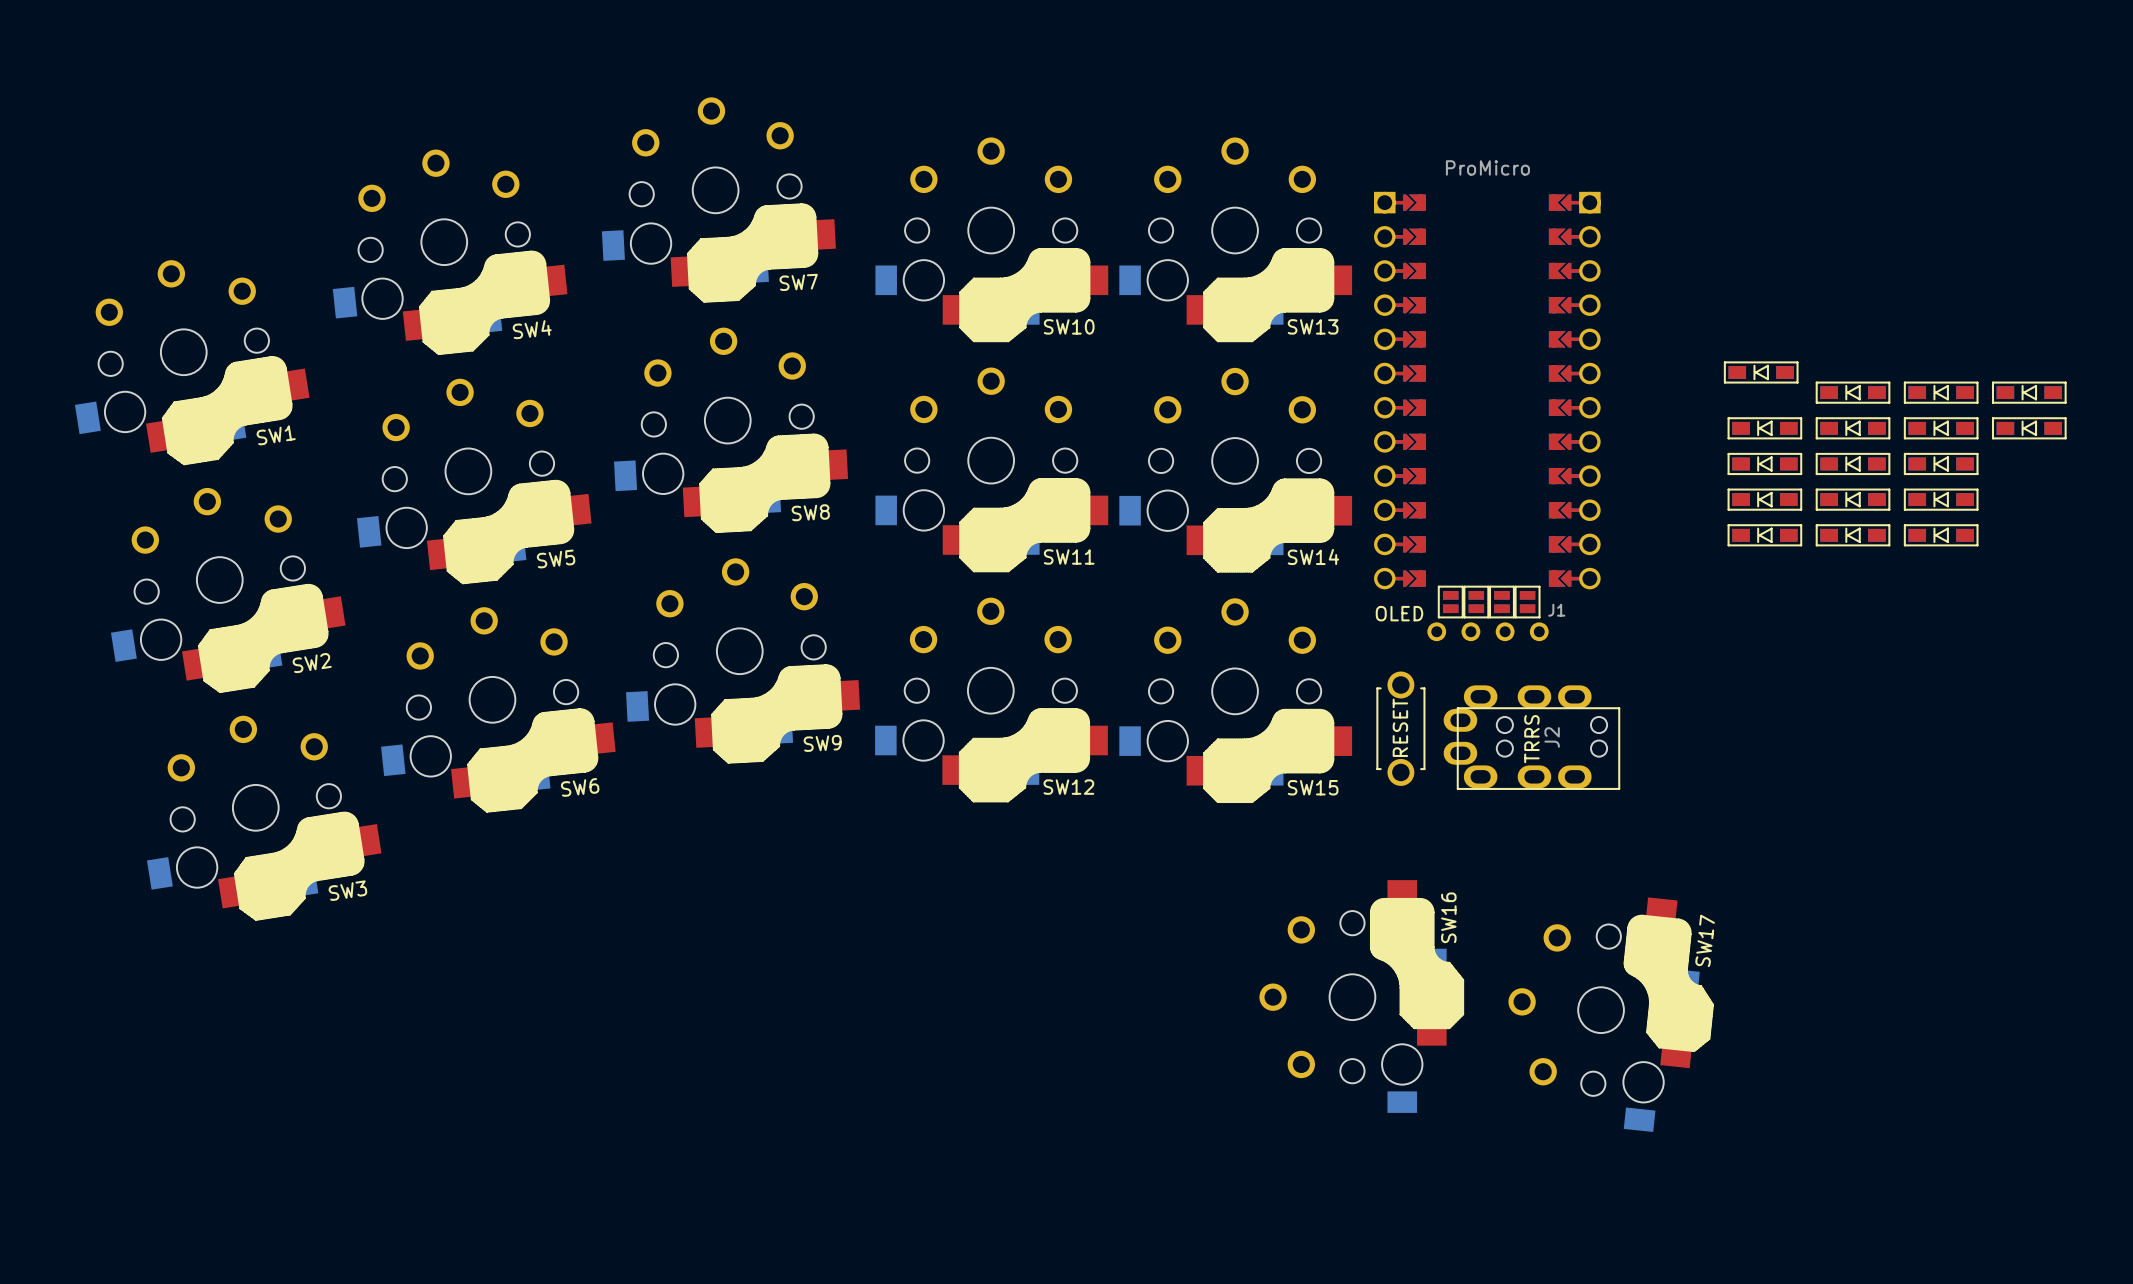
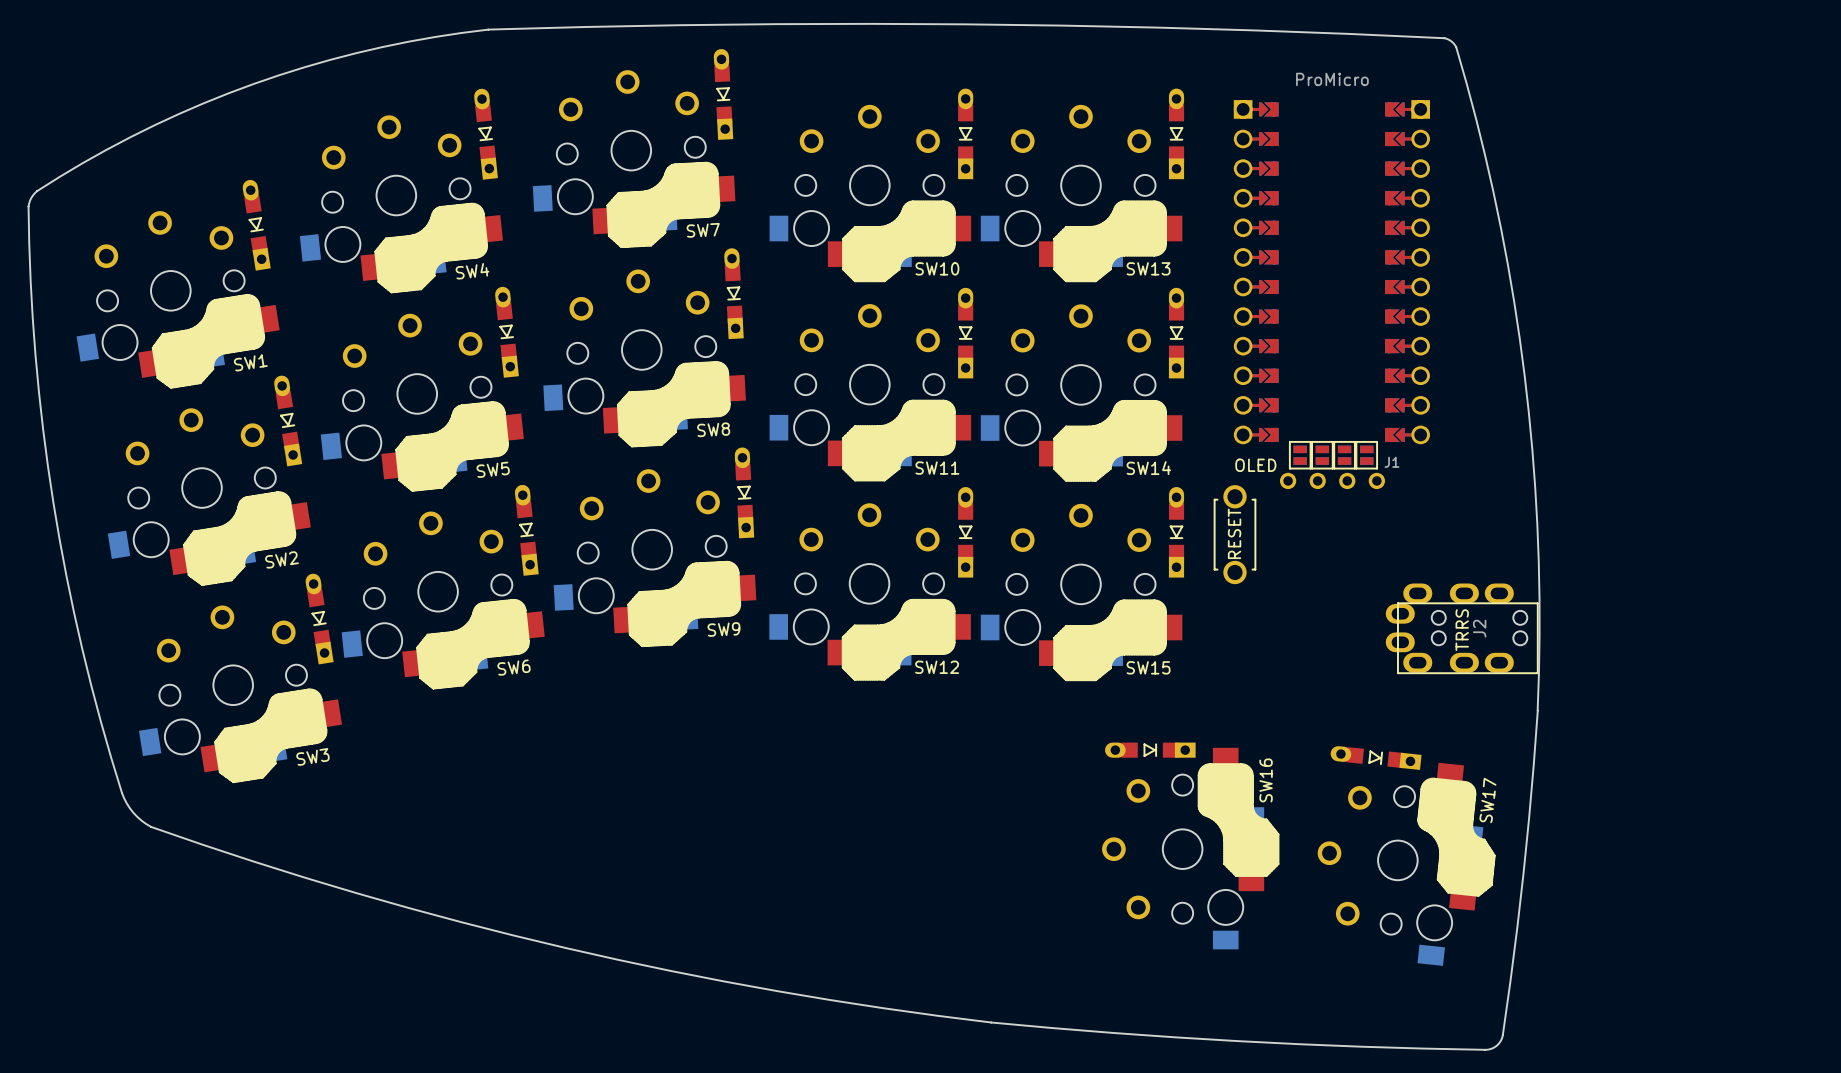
part: none -> (723, 94)
part: none -> (965, 133)
part: none -> (1176, 133)
part: none -> (486, 134)
part: none -> (256, 225)
part: none -> (734, 293)
part: (1761, 372) -> none
part position: (1487, 390) -> (1331, 272)
part: (1853, 392) -> none
part: (1941, 392) -> none
part: (2029, 392) -> none
part: none -> (507, 332)
part: none -> (965, 333)
part: none -> (1176, 333)
part: (1764, 428) -> none
part: (1853, 428) -> none
part: (1941, 428) -> none
part: (2029, 428) -> none
part: (1764, 463) -> none
part: (1853, 463) -> none
part: (1941, 463) -> none
part: (1764, 499) -> none
part: (1853, 499) -> none
part: (1941, 499) -> none
part: none -> (288, 421)
part: (1764, 535) -> none
part: (1853, 535) -> none
part: (1941, 535) -> none
part: none -> (1300, 455)
part: none -> (1322, 455)
part: none -> (1344, 455)
part: none -> (1366, 455)
part: none -> (744, 492)
part: (1450, 602) -> none
part: (1476, 602) -> none
part: (1501, 602) -> none
part: (1527, 602) -> none
part: none -> (526, 530)
part: none -> (965, 532)
part: none -> (1176, 532)
J1 position: (1488, 631) -> (1332, 480)
part position: (1400, 728) -> (1235, 534)
part: none -> (319, 619)
J2 position: (1531, 737) -> (1462, 628)
board edge: none -> (1537, 710) (1539, 635) (1537, 524) (1532, 449) (1519, 338) (1507, 264) (1485, 155) (1456, 47) (1446, 38) (1253, 30) (966, 24) (679, 25) (488, 29) (435, 36) (356, 53) (278, 75) (228, 93) (178, 114) (106, 149) (37, 191) (30, 200) (29, 243) (32, 318) (47, 466) (74, 612) (100, 721) (121, 792) (133, 812) (151, 826) (202, 844) (356, 893) (513, 935) (671, 971) (830, 1000) (991, 1022) (1114, 1033) (1299, 1044) (1487, 1049) (1498, 1044) (1502, 1035) (1523, 873) (1537, 710)
part: none -> (1150, 750)
part: none -> (1376, 758)

